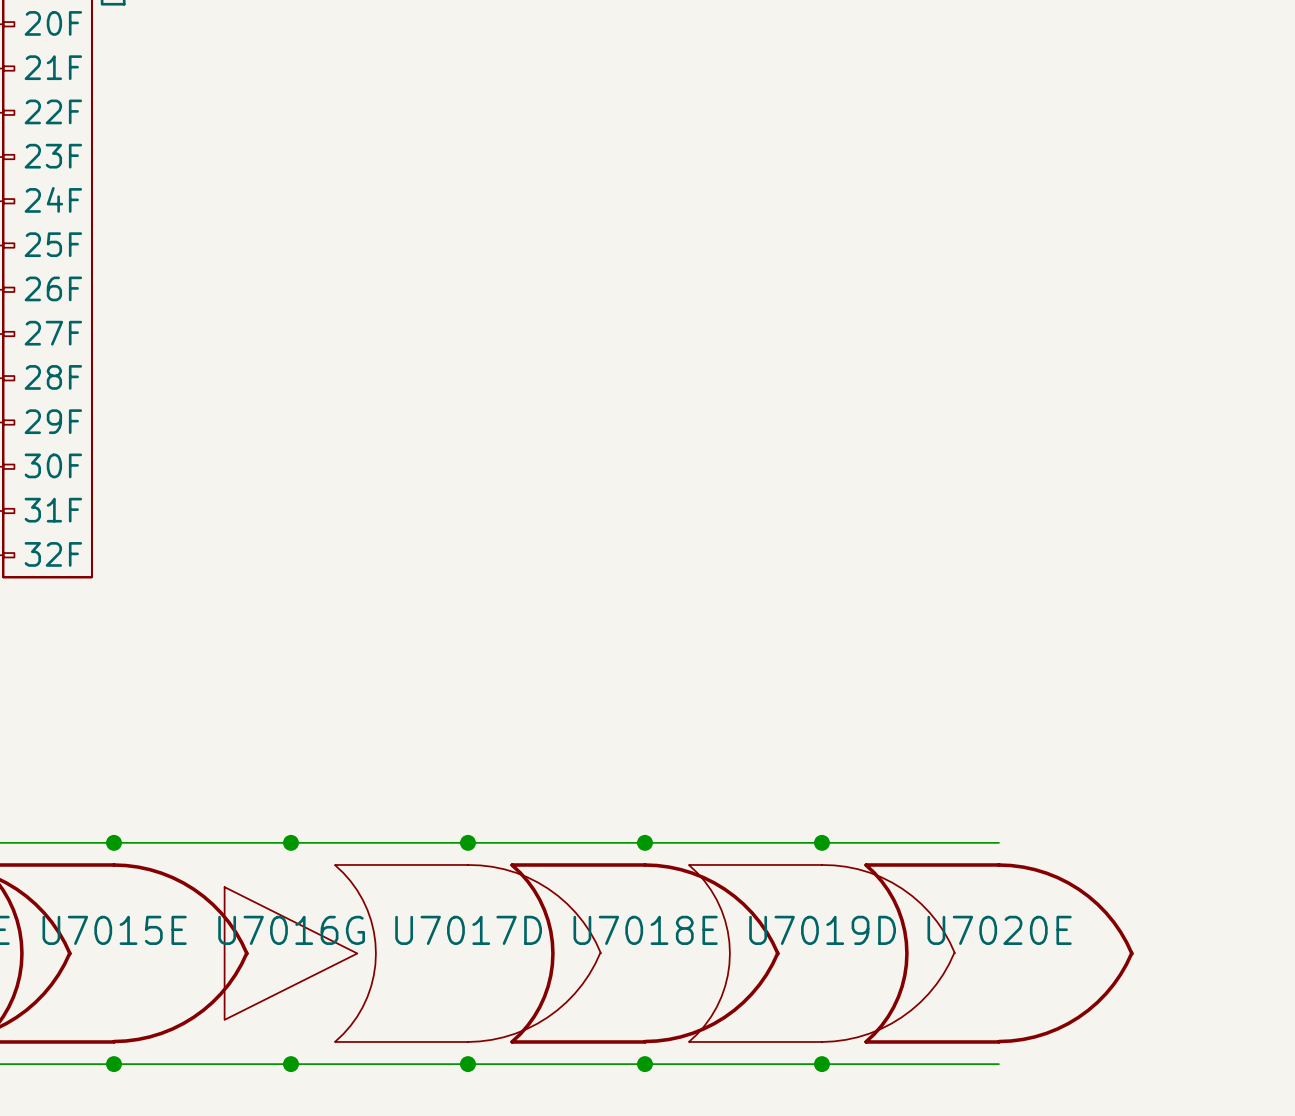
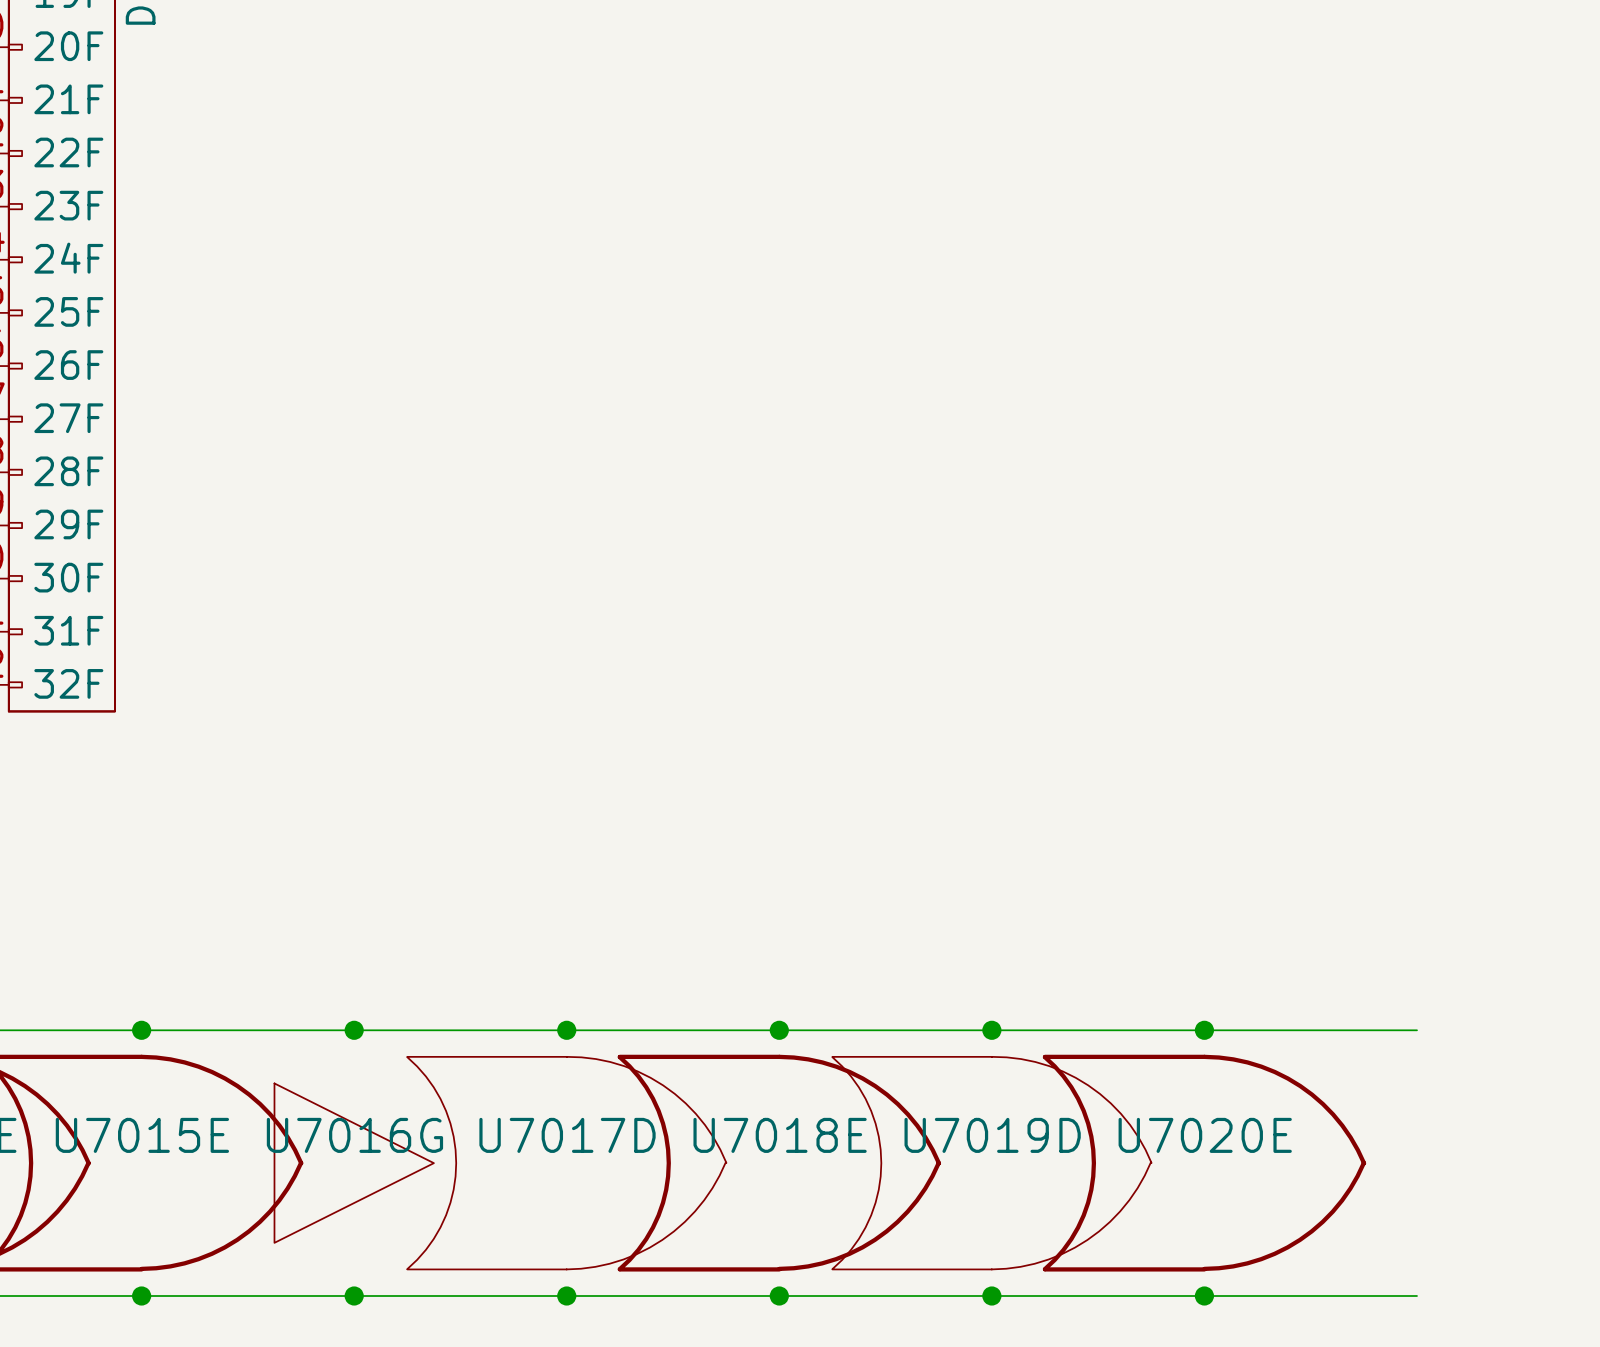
wire: none -> (1204, 1030) (1416, 1030)
junction: none -> (1204, 1030)
wire: none -> (1204, 1295) (1416, 1295)
junction: none -> (1204, 1295)

